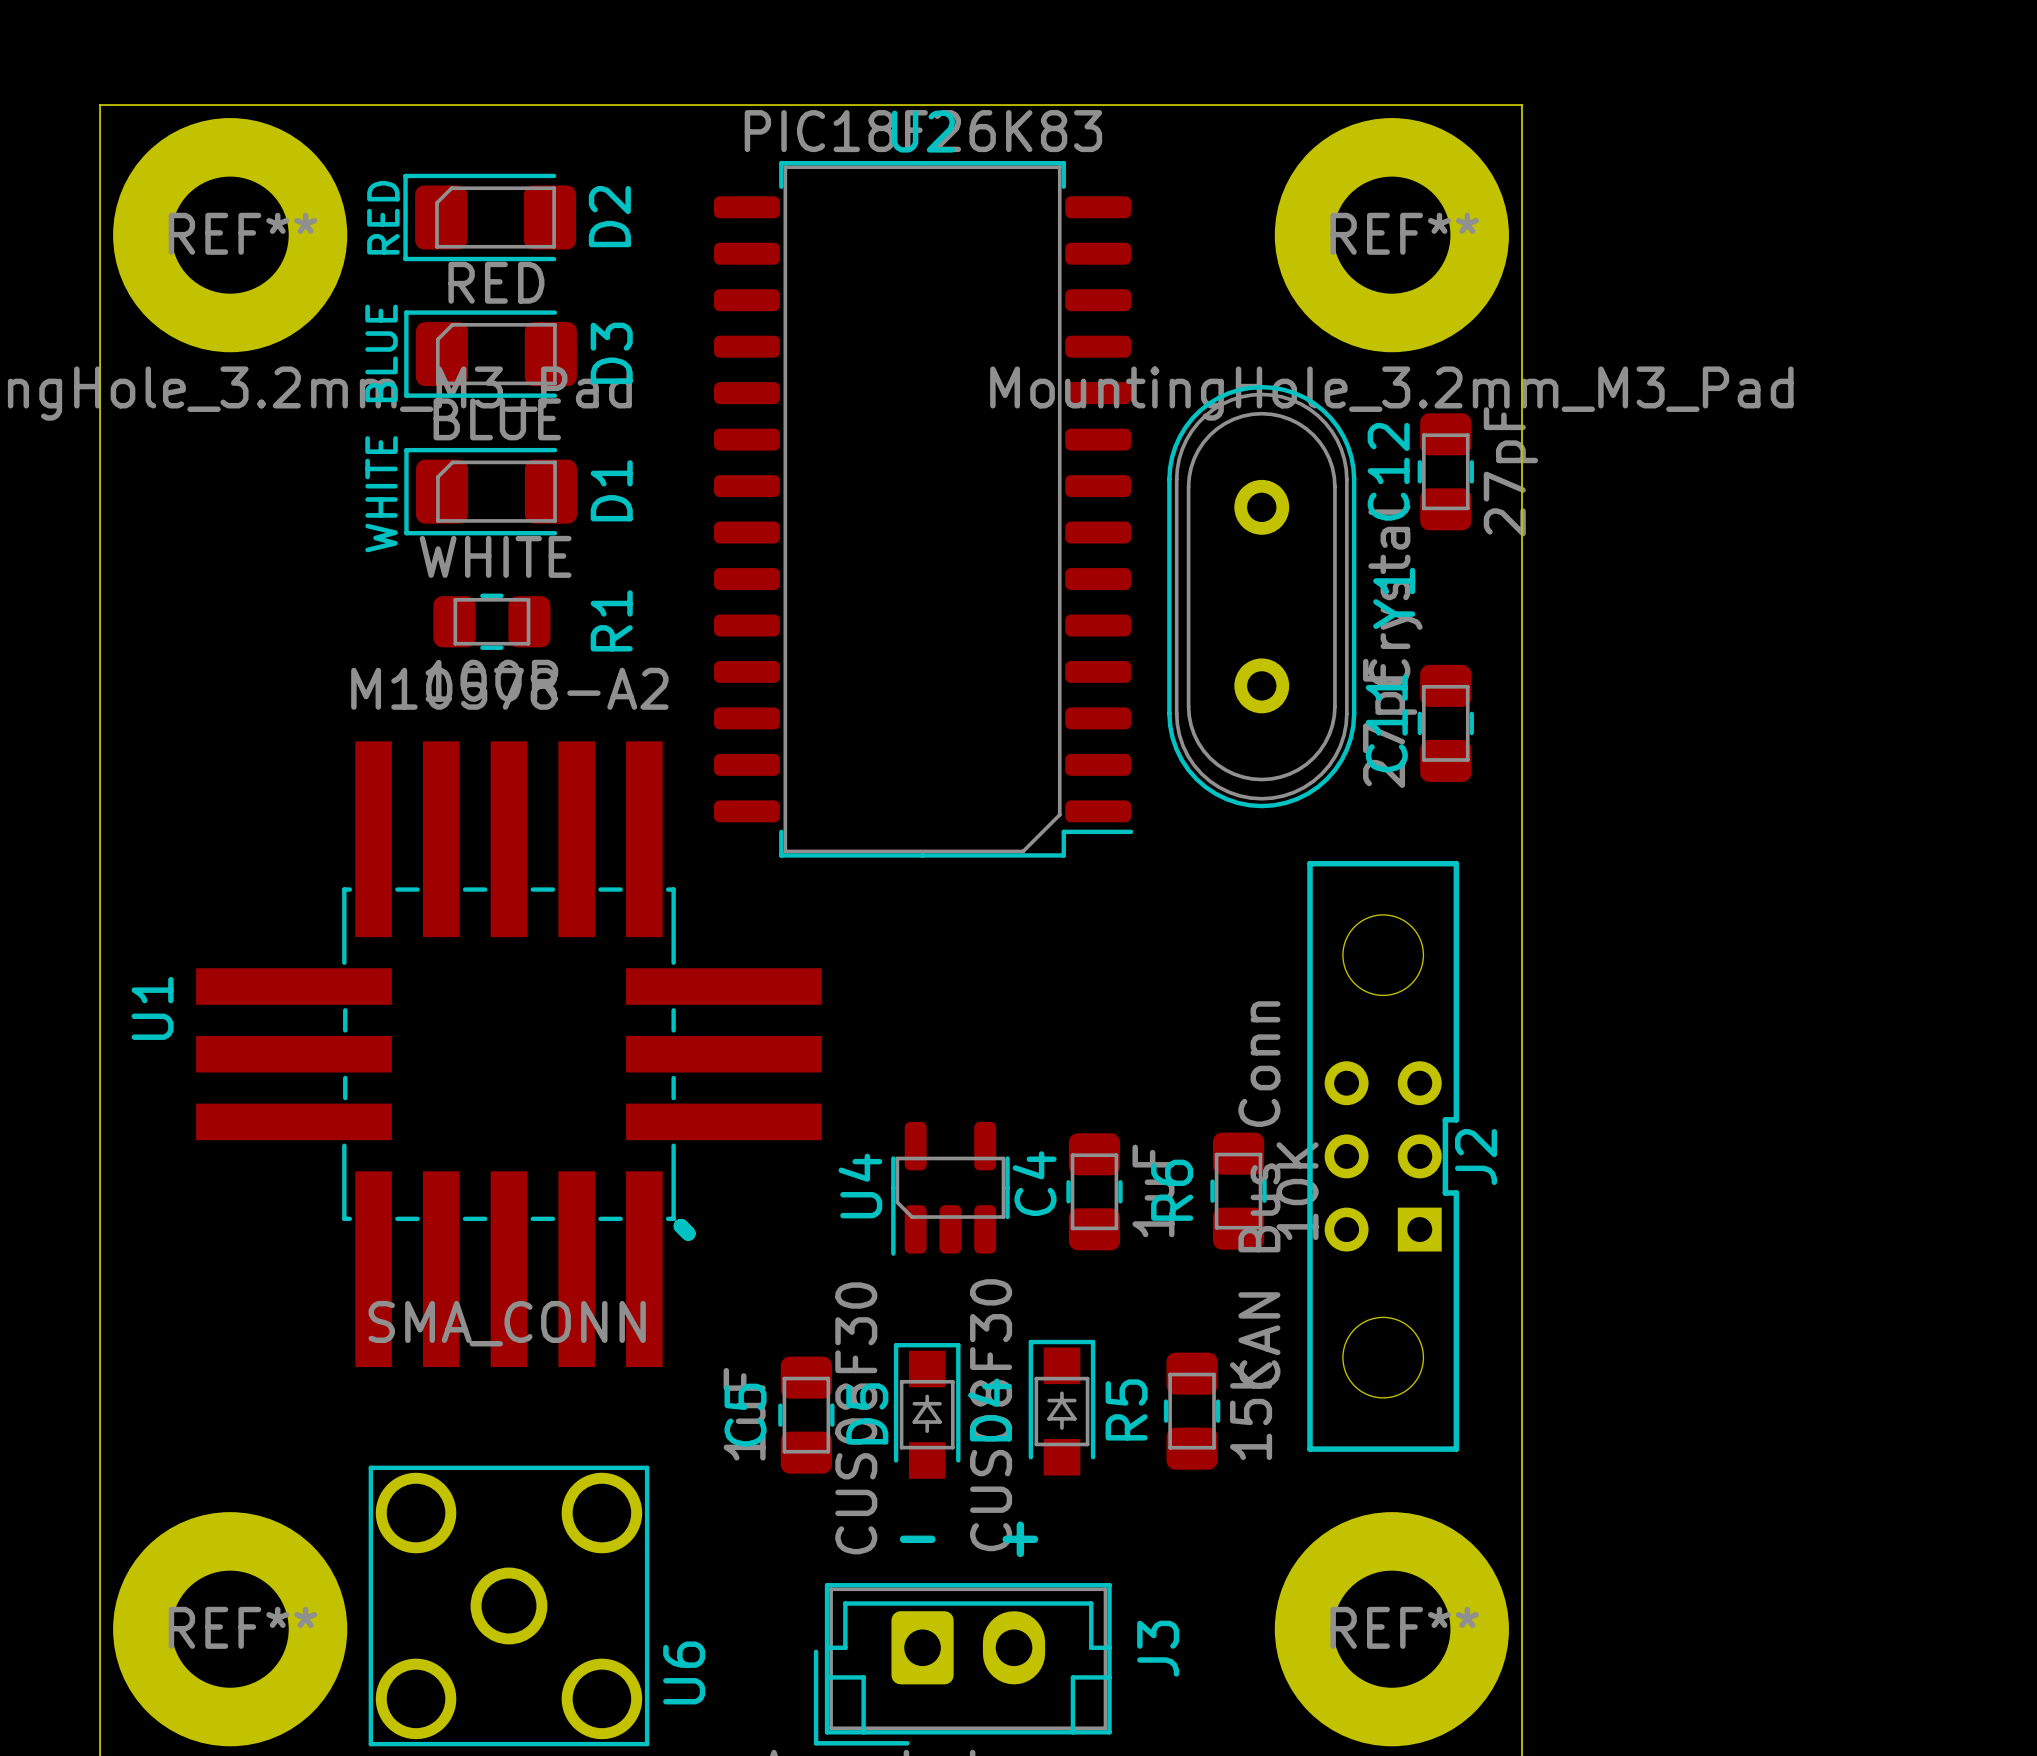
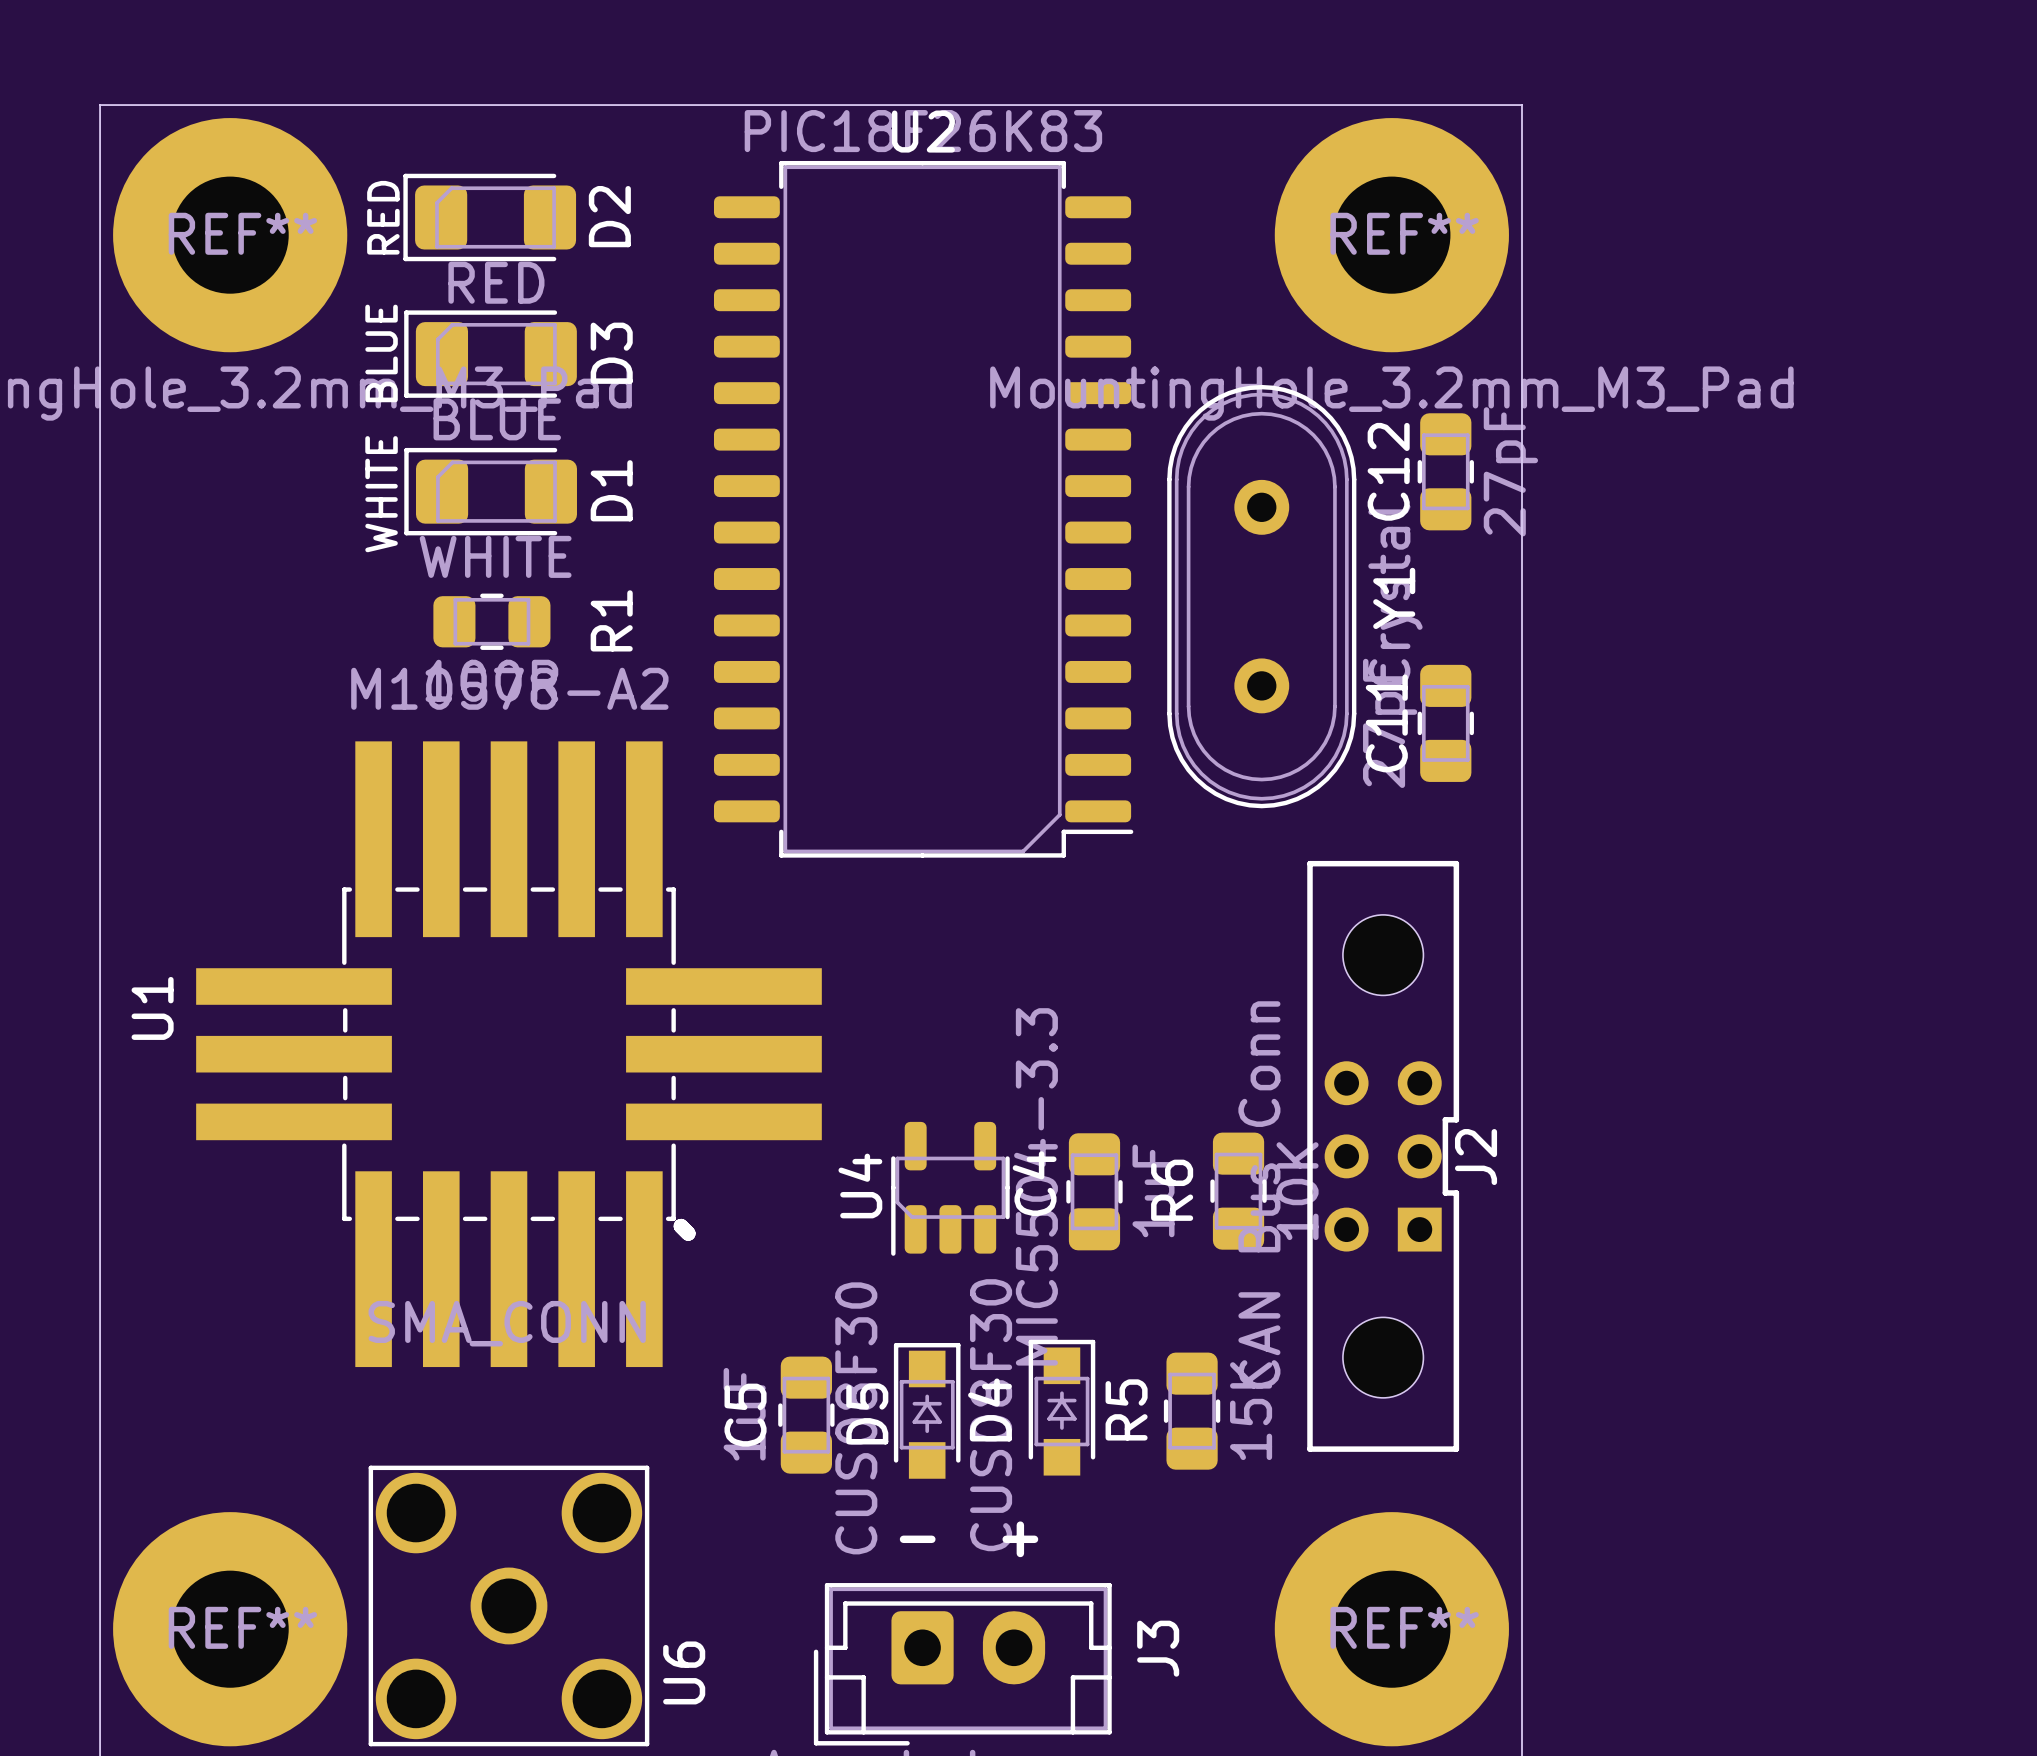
U4 value: none -> MIC5504-3.3 (1036, 1186)

